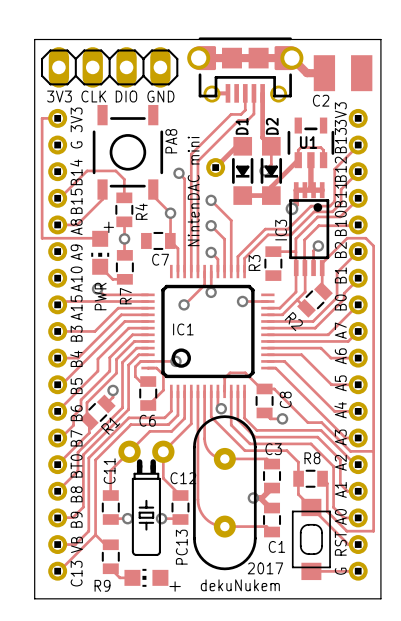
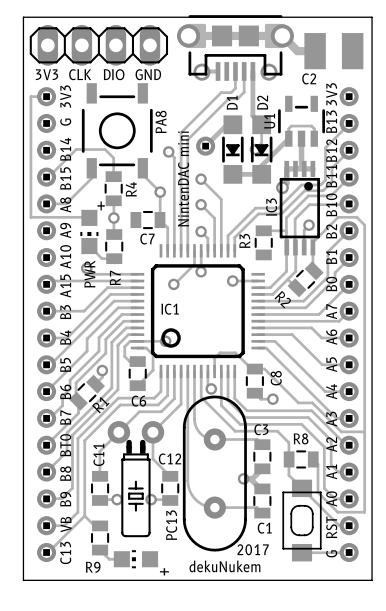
U1 name rotation: 0° (308, 142) -> 90° counterclockwise (269, 121)
U1 name position: U1 (308, 142) -> U1 (269, 121)

